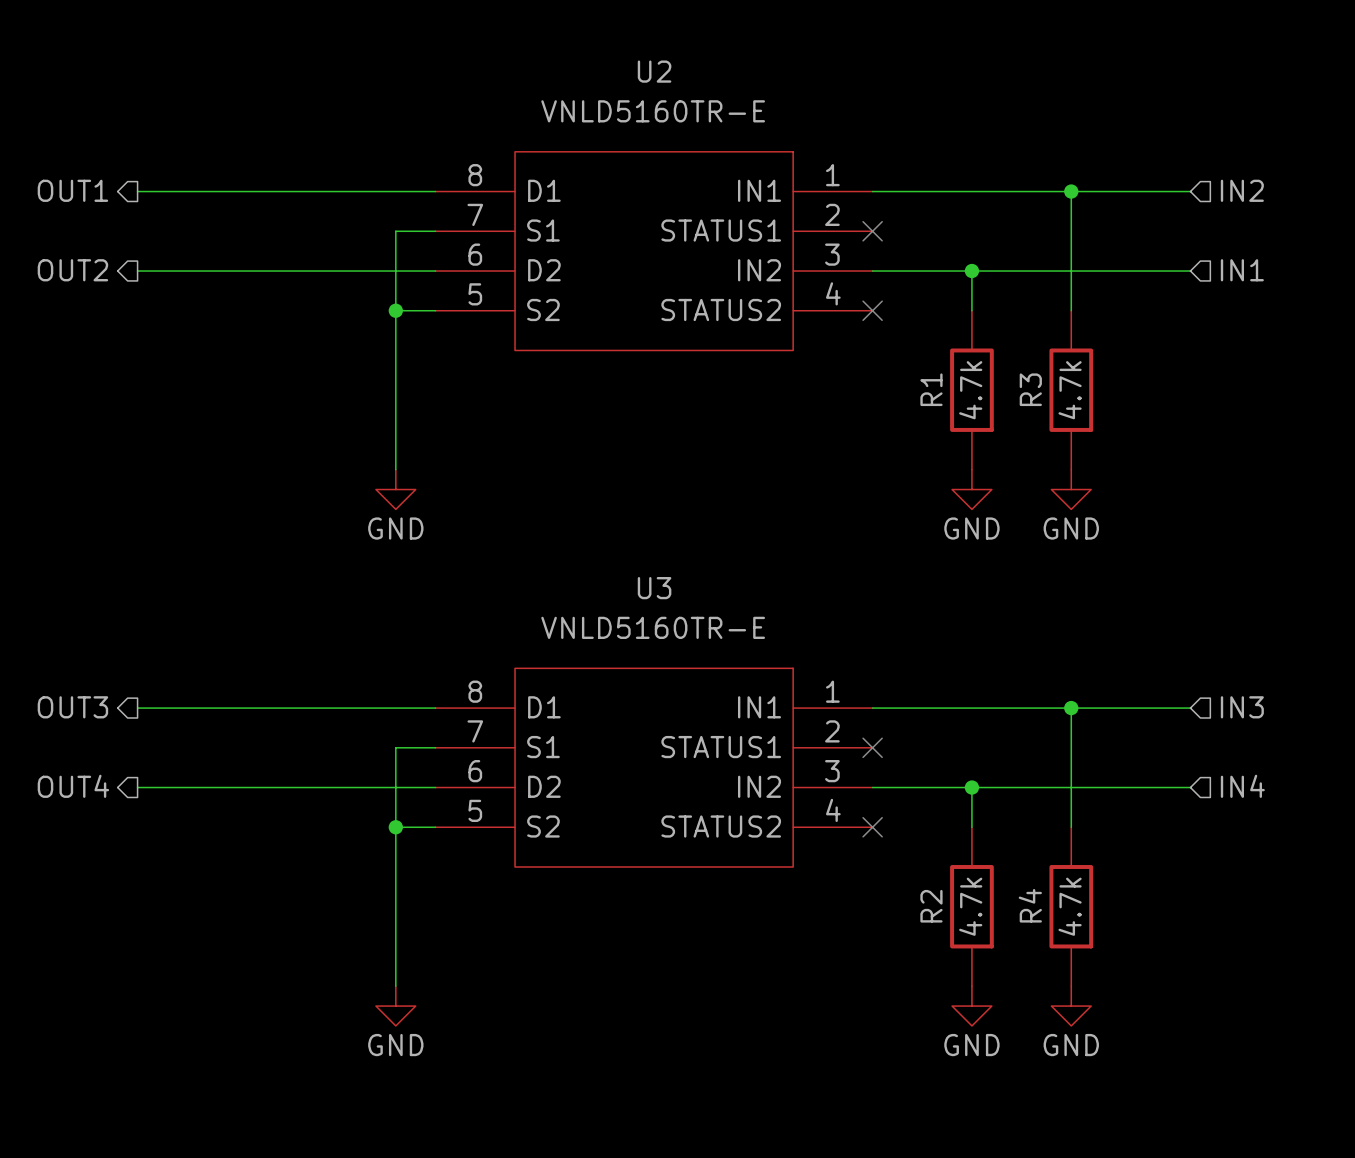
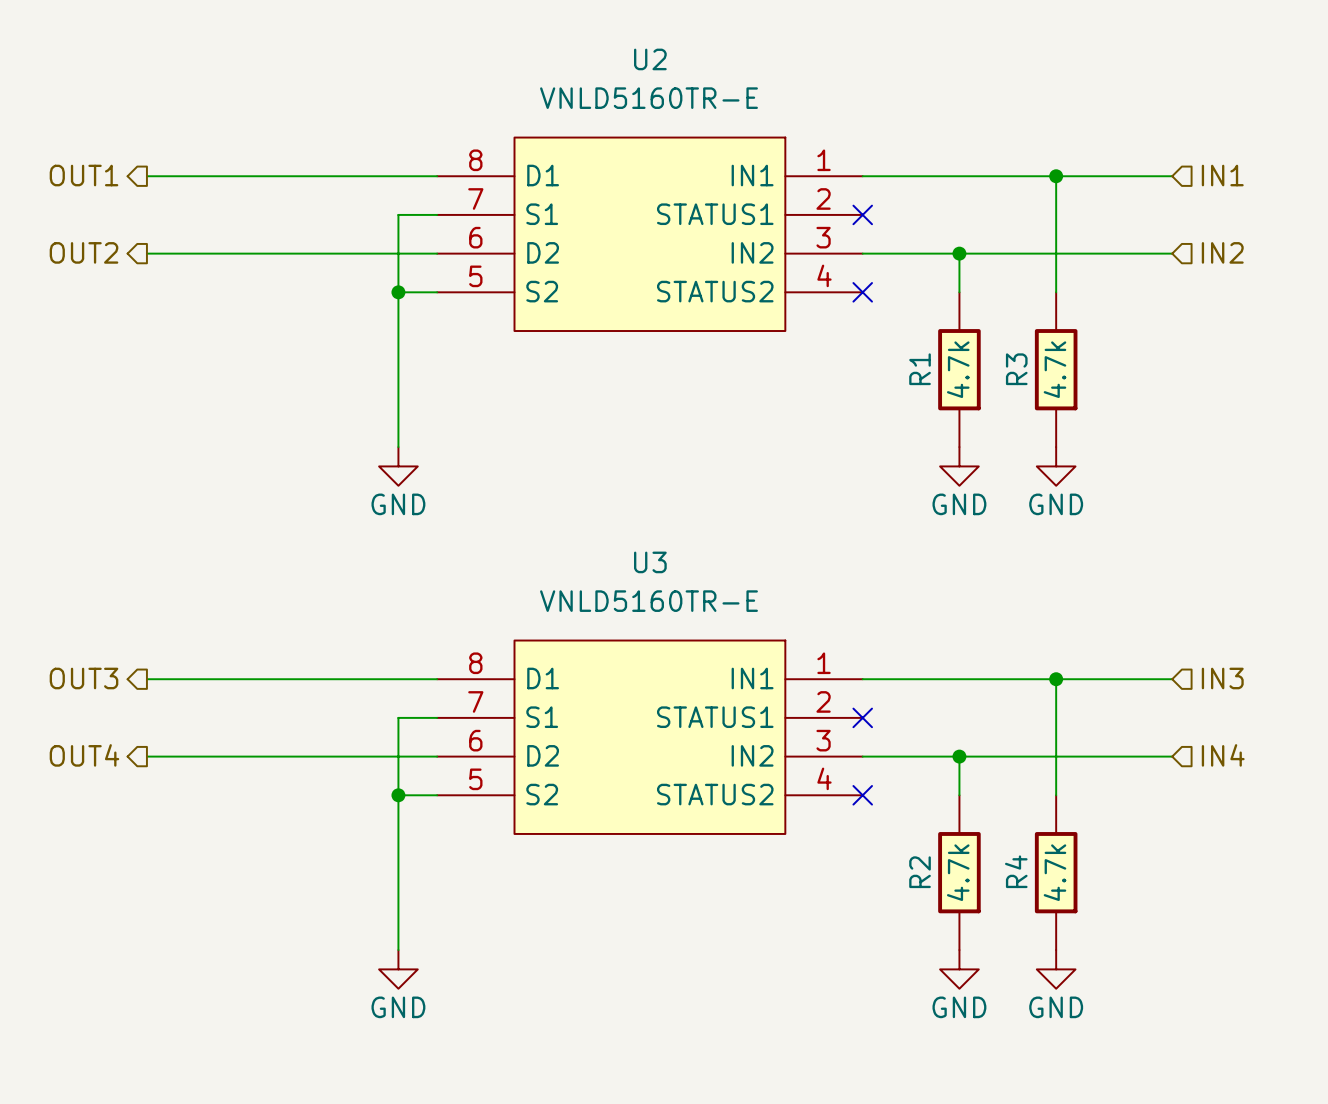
hierarchical label: IN2 (1242, 190) -> IN1 (1222, 175)
hierarchical label: IN1 (1242, 270) -> IN2 (1222, 252)

